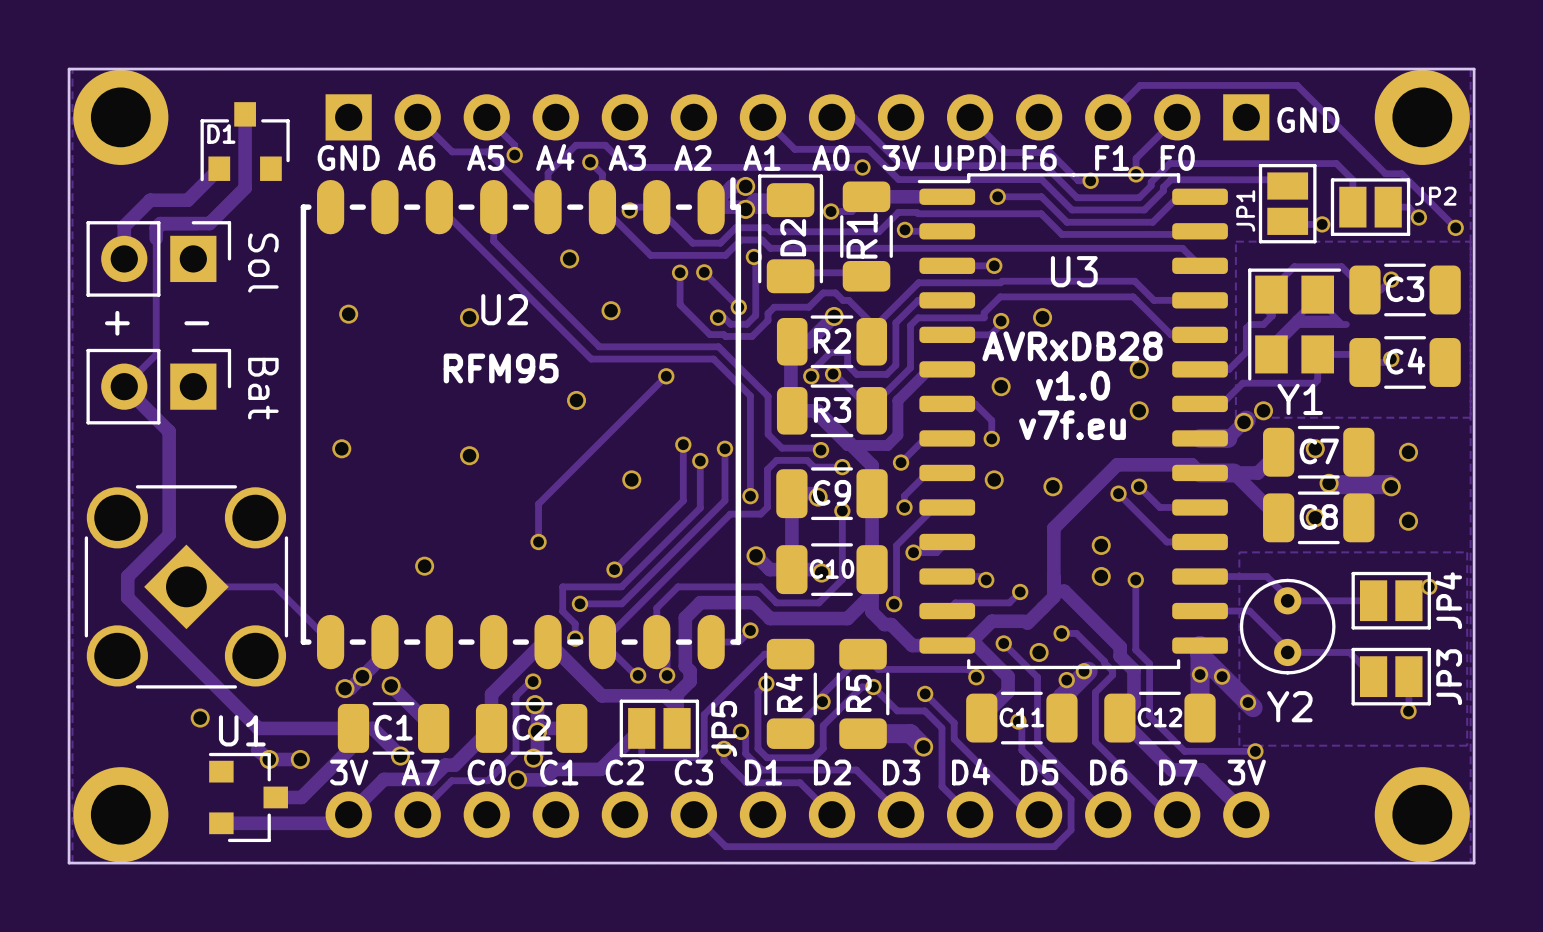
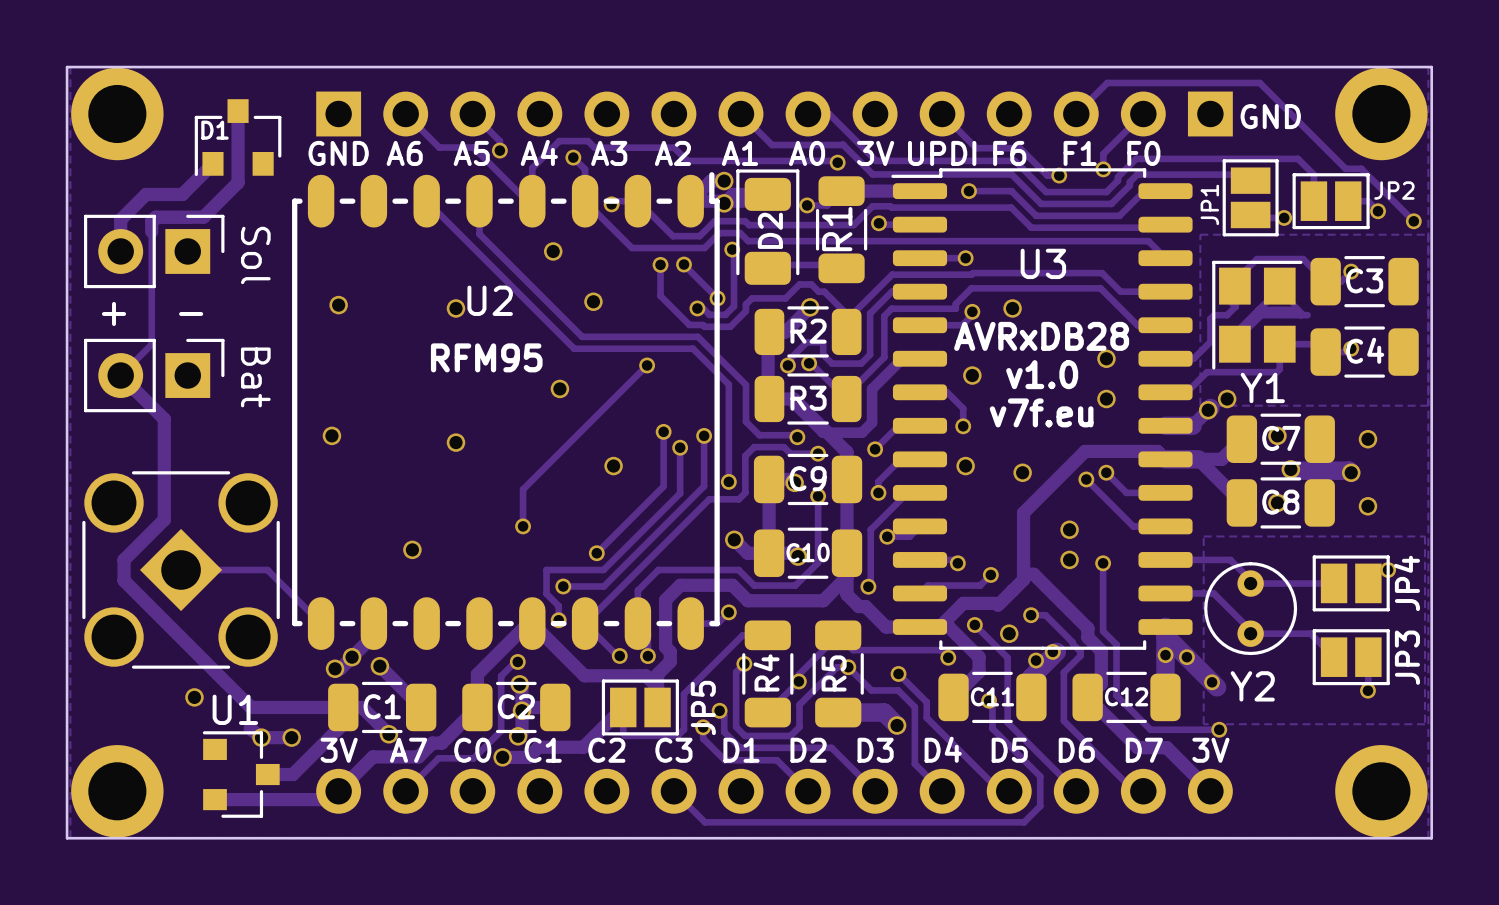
track: (612, 152) (627, 167) (862, 167) -> (594, 147) (674, 147) (687, 160) (834, 160)

